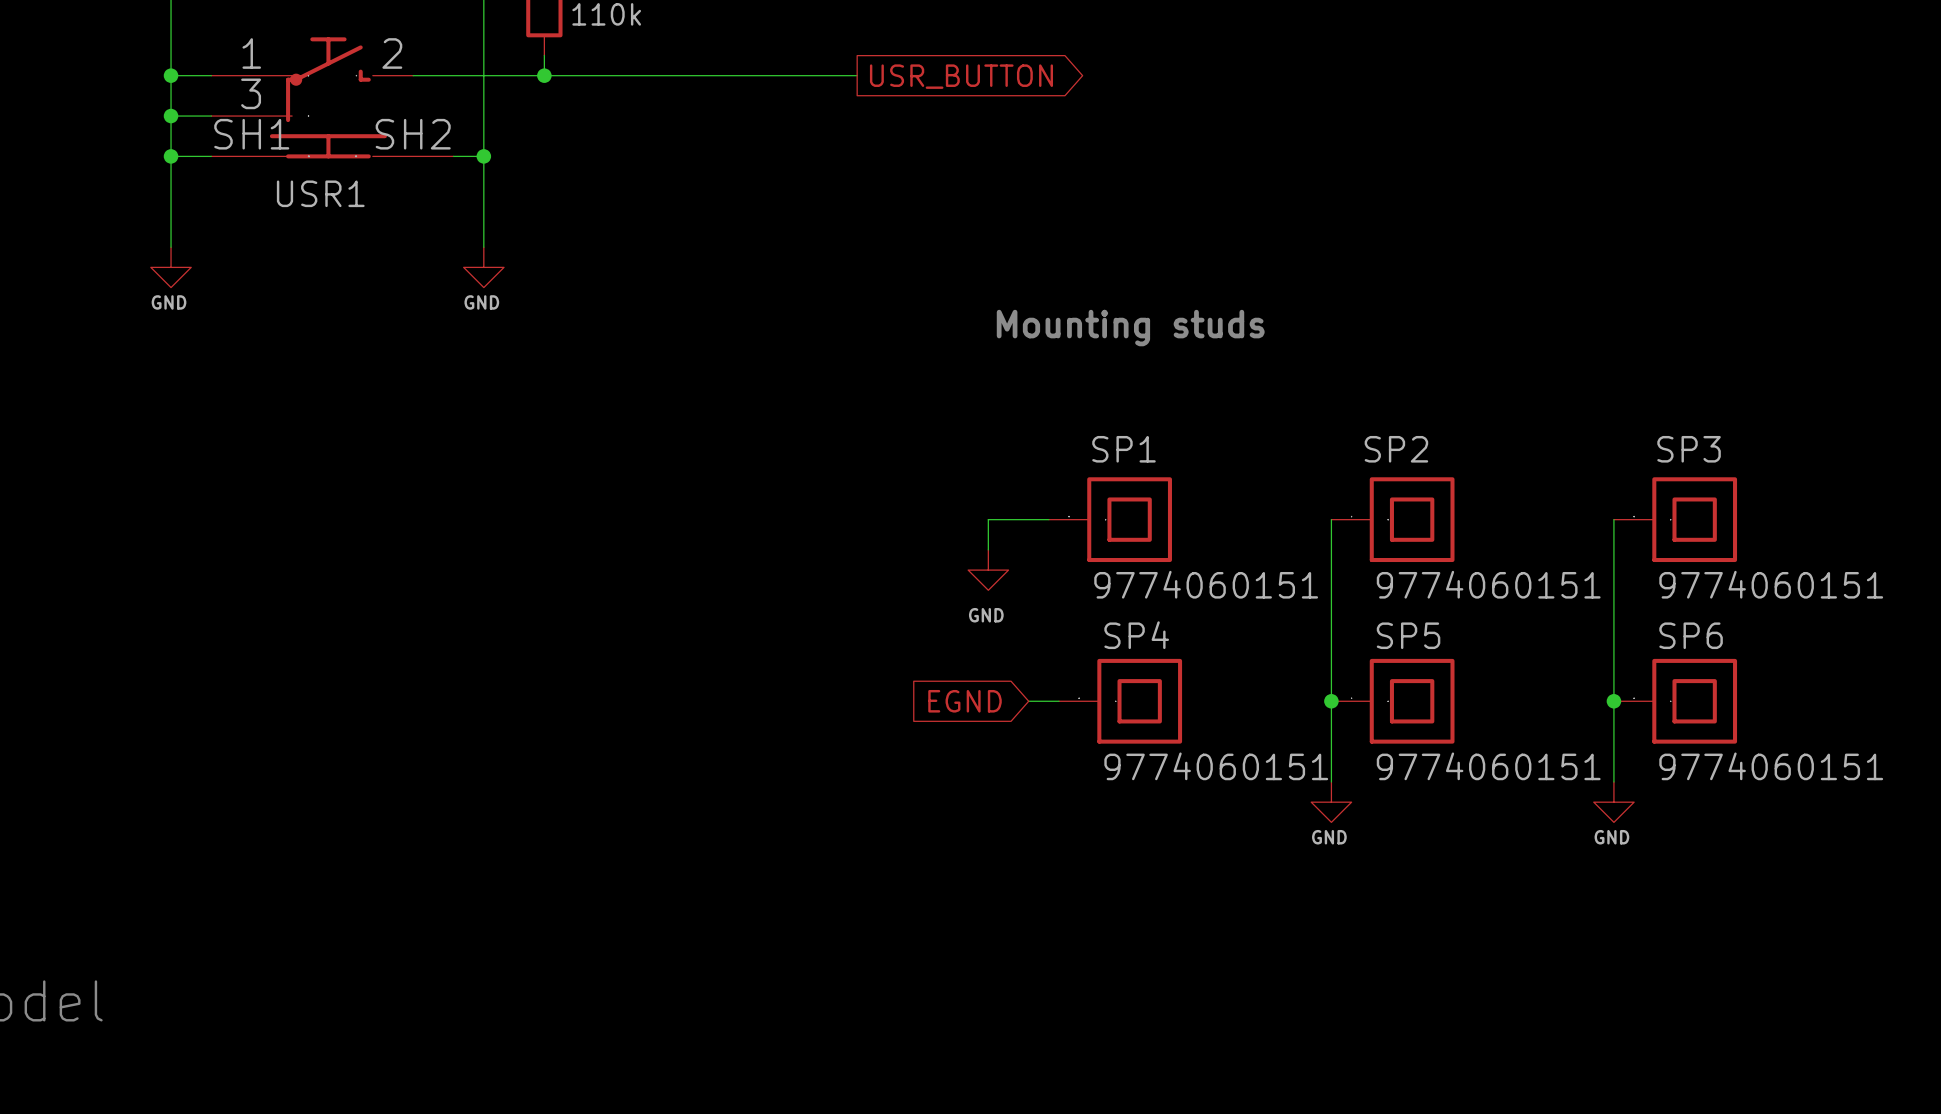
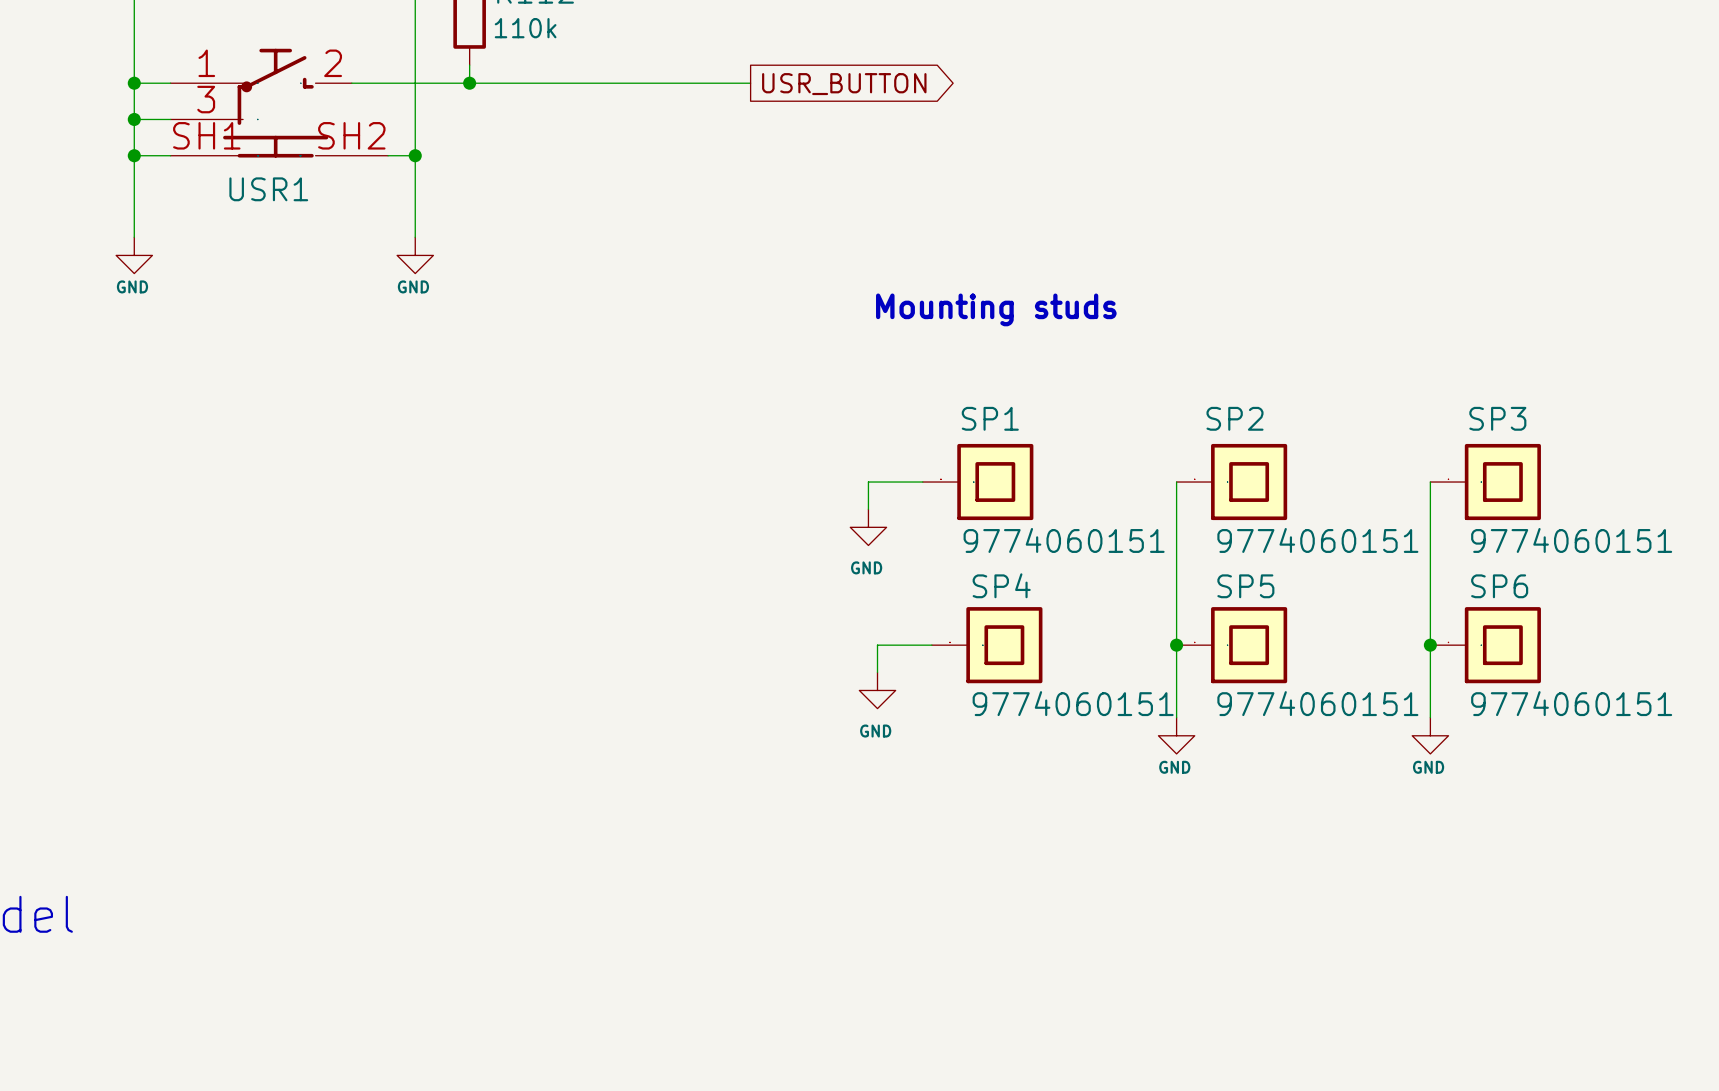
global label: EGND (965, 701) -> none
wire: none -> (904, 645) (877, 645) (877, 672)
power symbol: none -> GND (877, 690)

